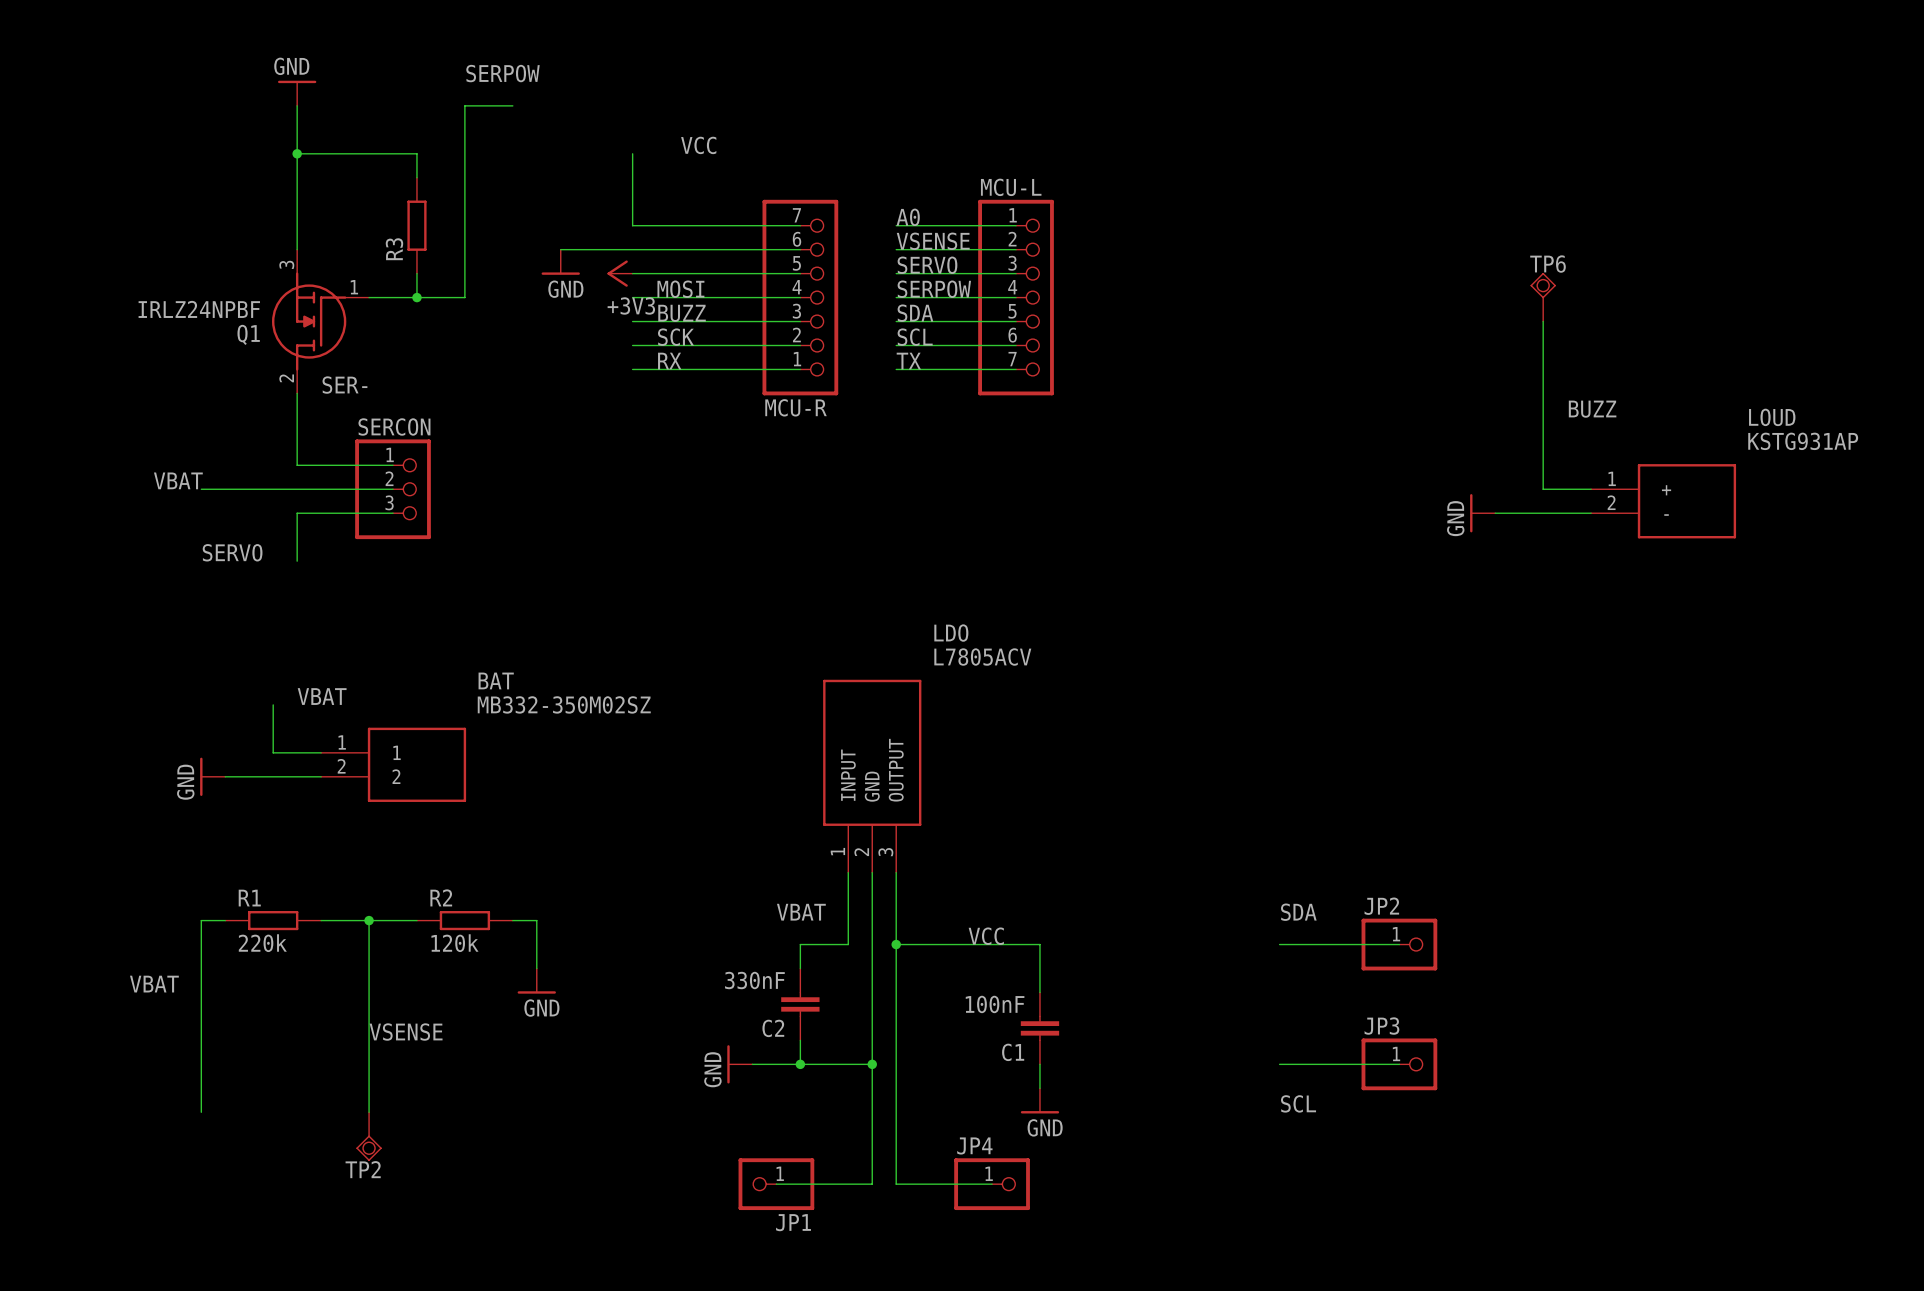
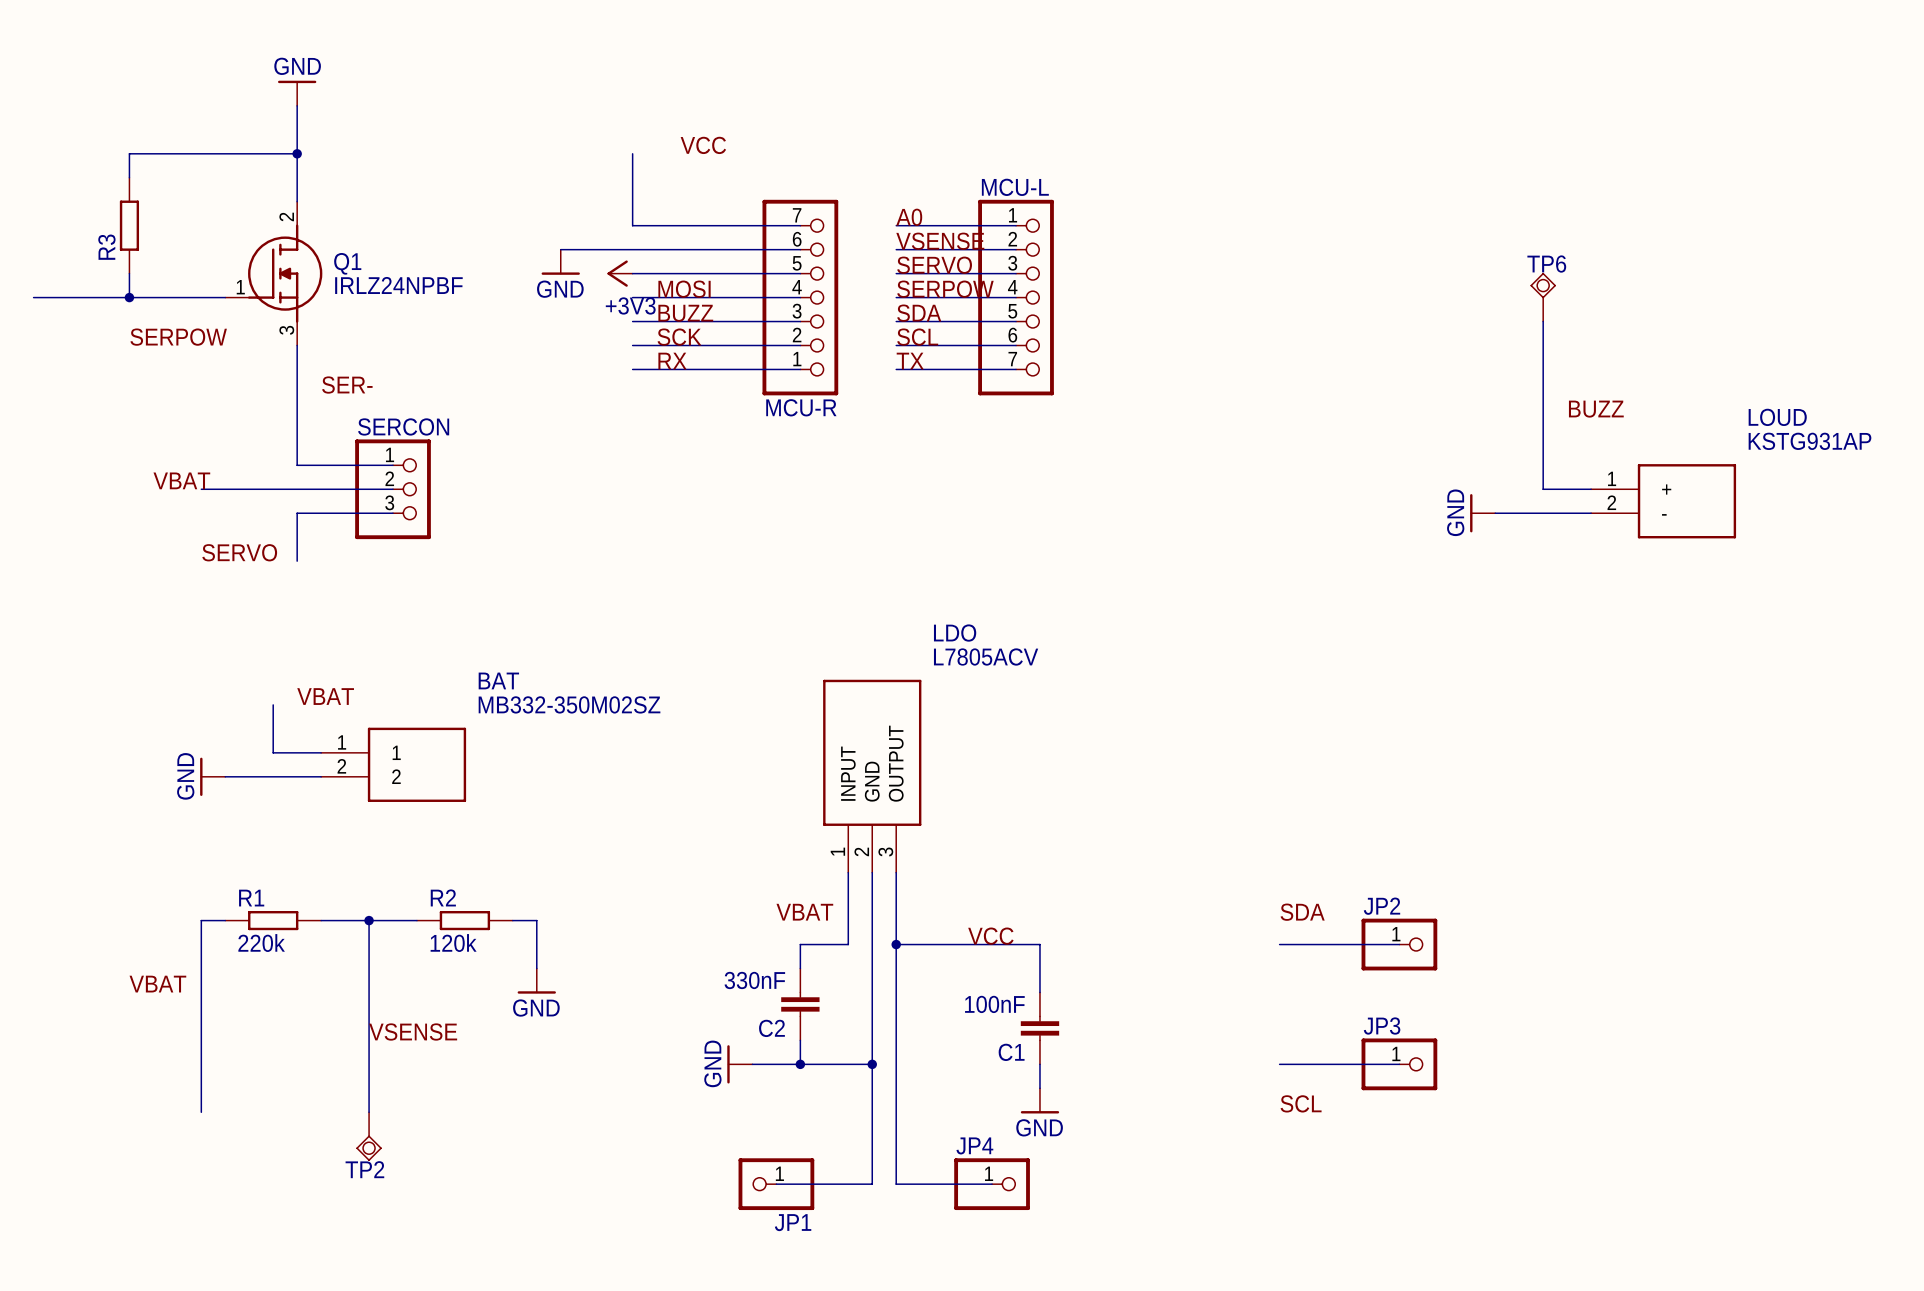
label: SERPOW (503, 73) -> none
wire: (512, 105) (464, 105) (464, 297) (369, 297) -> none
wire: (297, 153) (416, 153) (416, 177) -> (297, 153) (129, 153) (129, 177)
R3 position: (416, 225) -> (129, 225)
wire: none -> (129, 273) (129, 297)
wire: none -> (33, 297) (225, 297)
junction: none -> (129, 297)
junction: (416, 297) -> none
Q1 rotation: 0° (309, 321) -> 180° (285, 273)
label: none -> SERPOW (178, 337)

